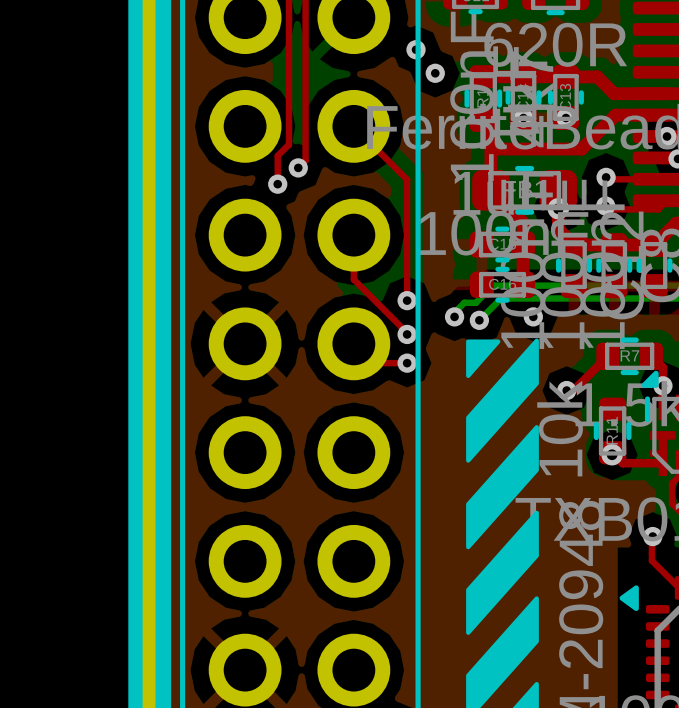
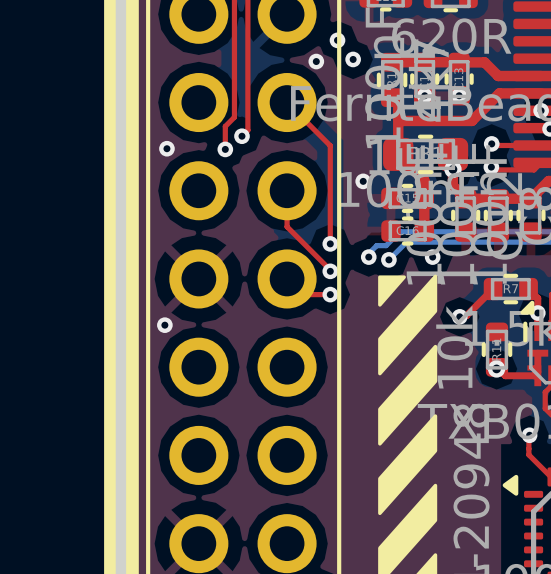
via: none -> (316, 61)
via: none -> (166, 148)
via: none -> (363, 181)
via: none -> (164, 325)

